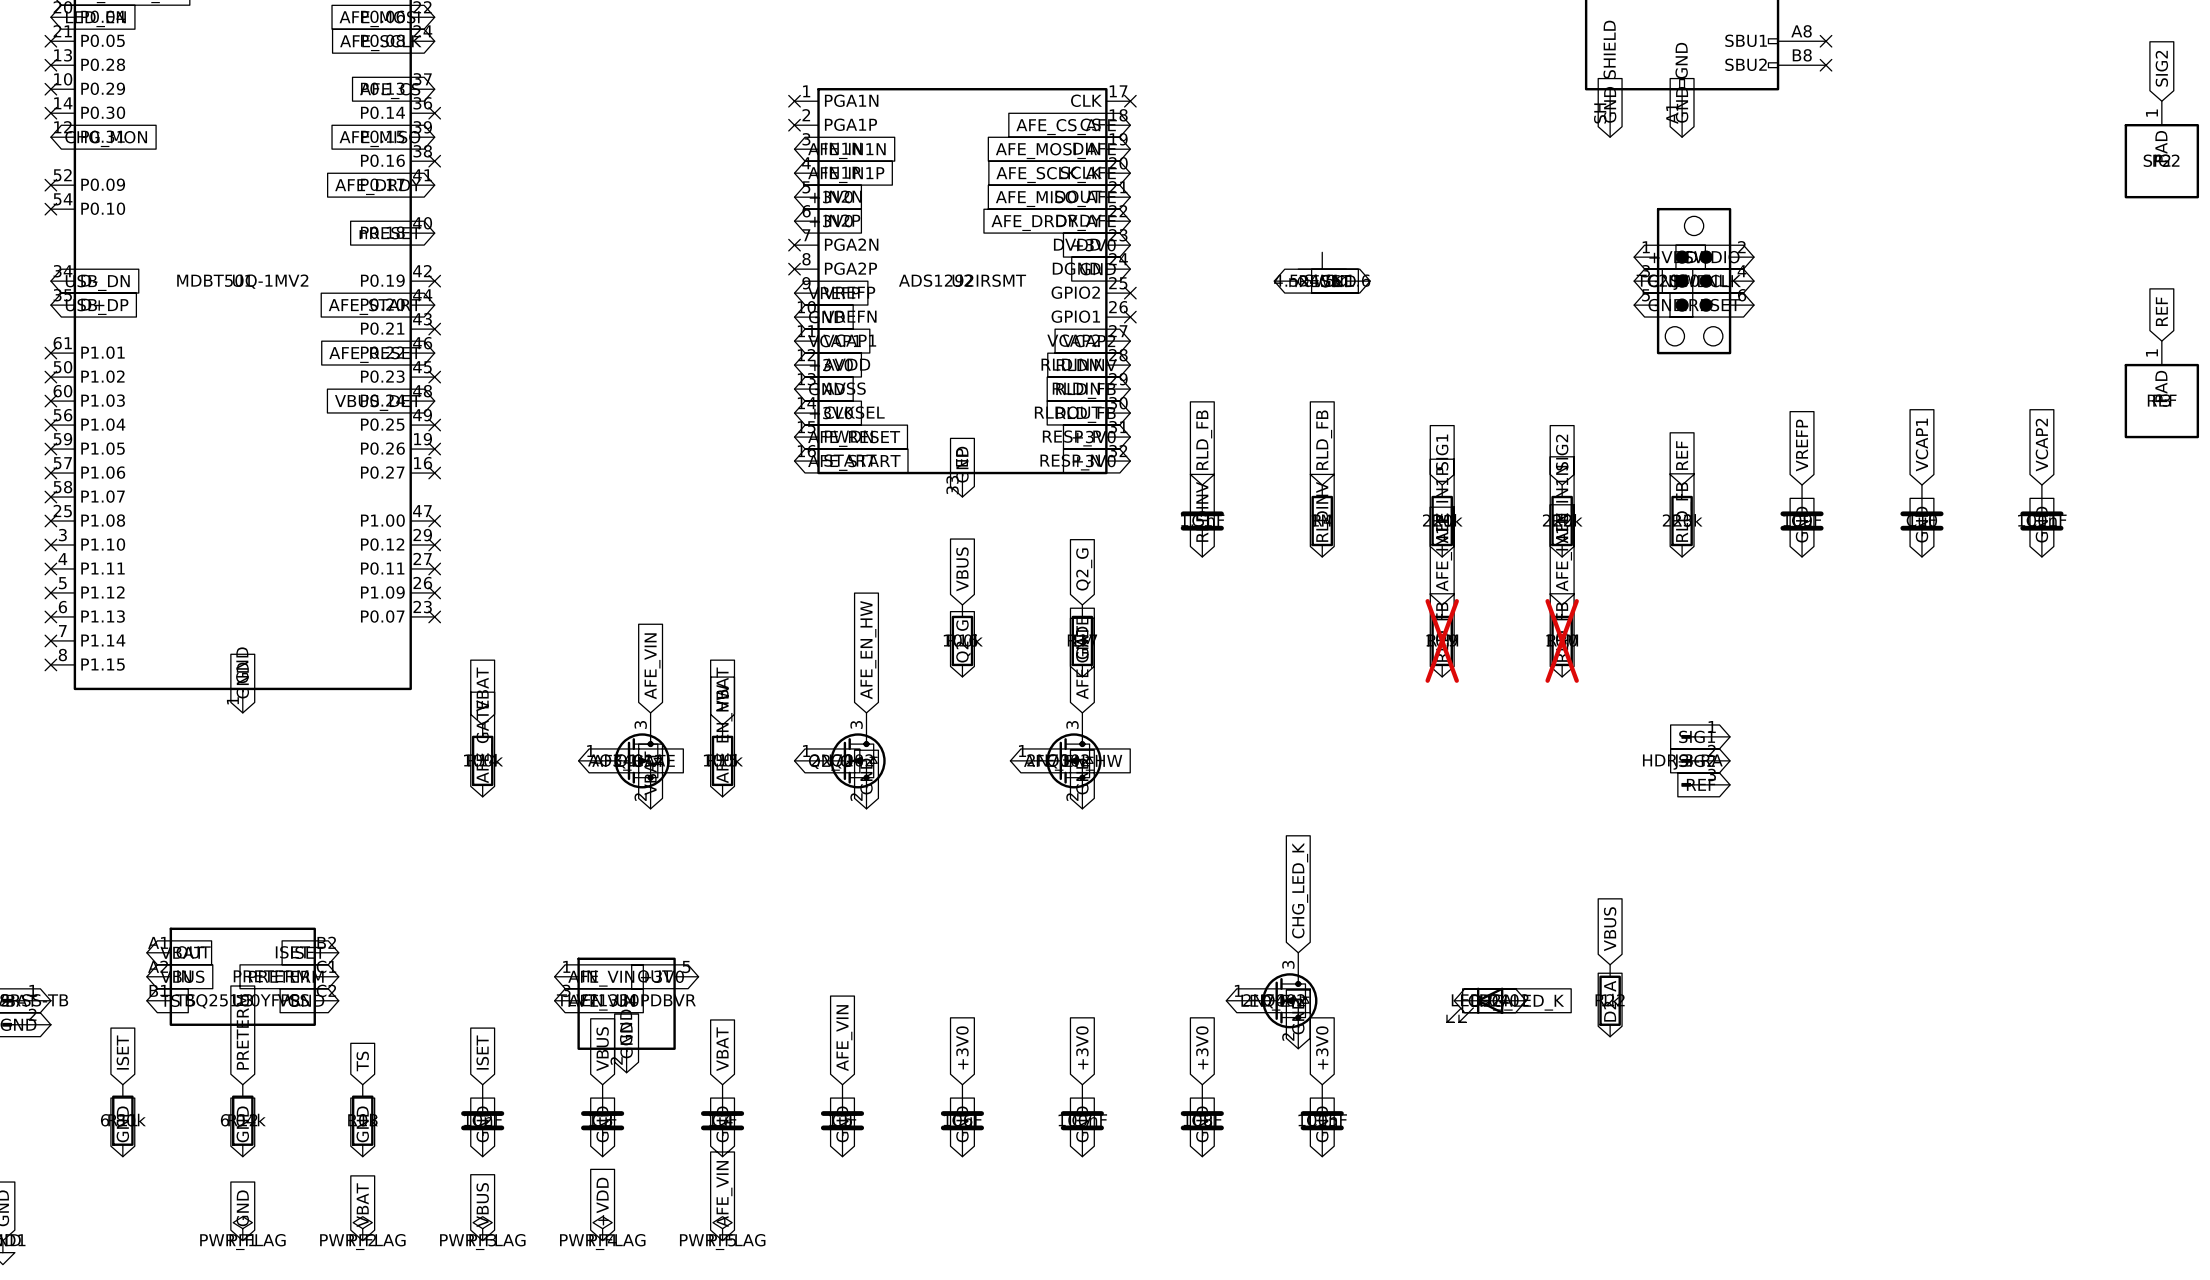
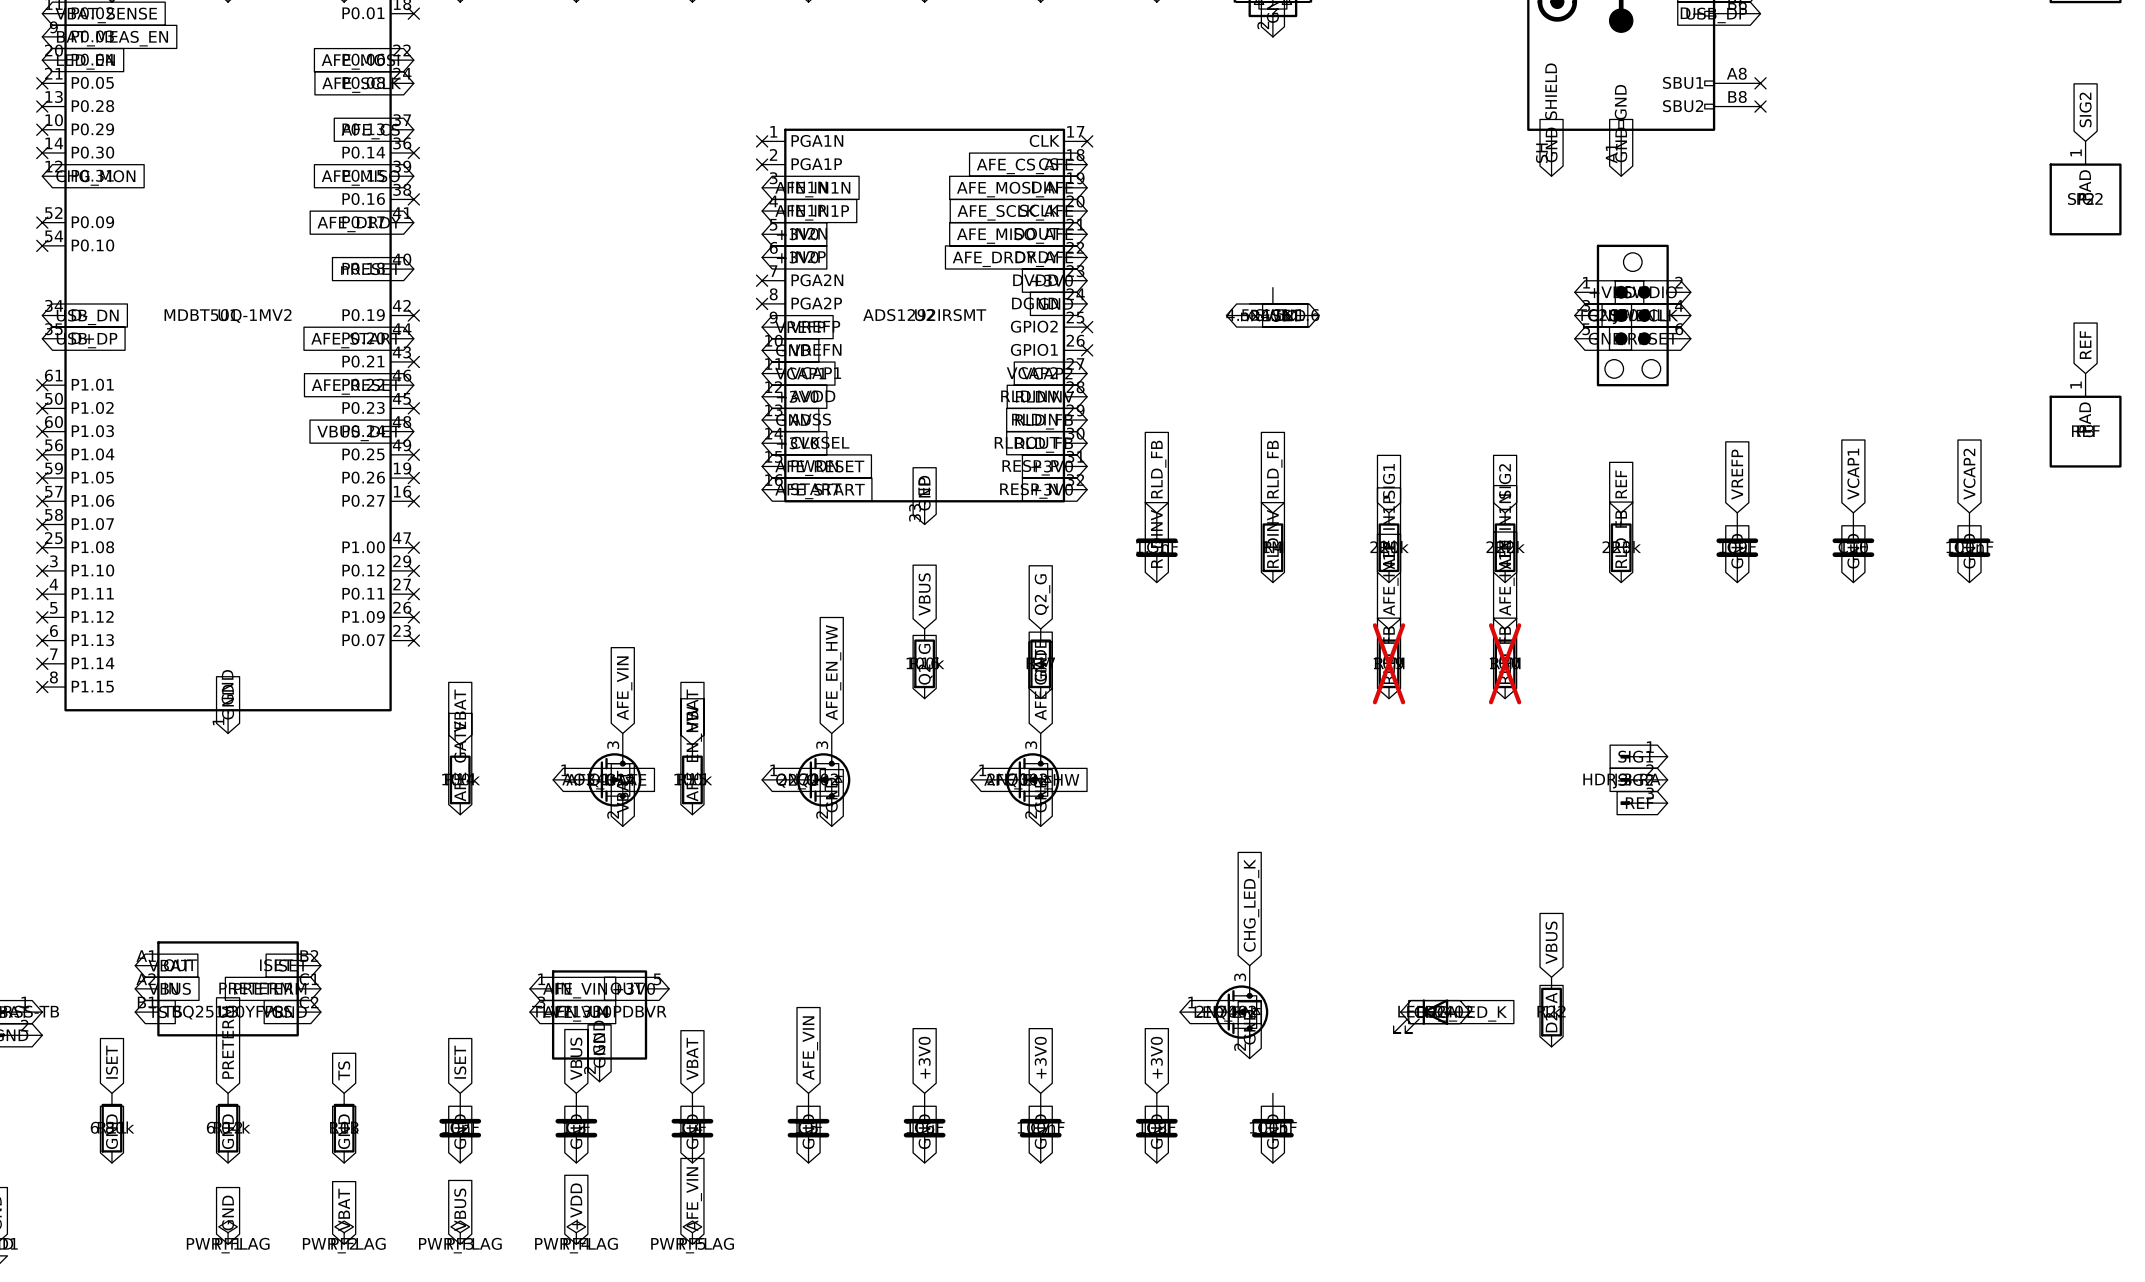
global label: +3V0 (1322, 1047) -> none

